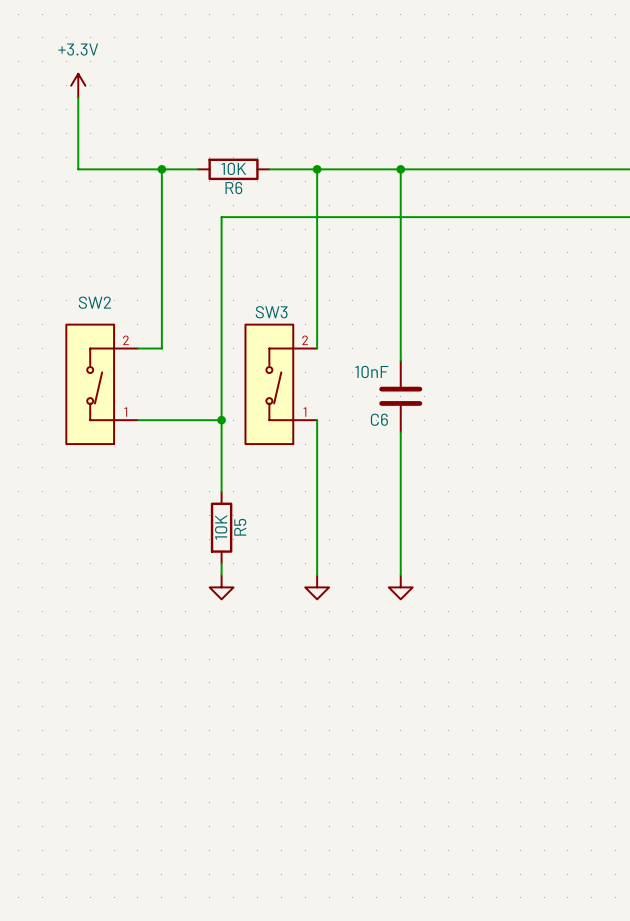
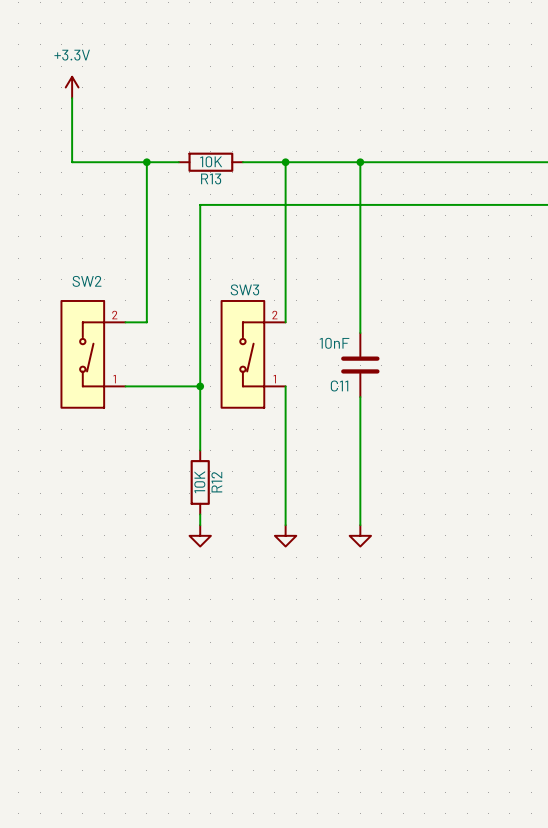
R6 name: R6 (233, 188) -> R13 (211, 178)
C6 name: C6 (379, 419) -> C11 (339, 386)
R5 name: R5 (240, 527) -> R12 (216, 482)

